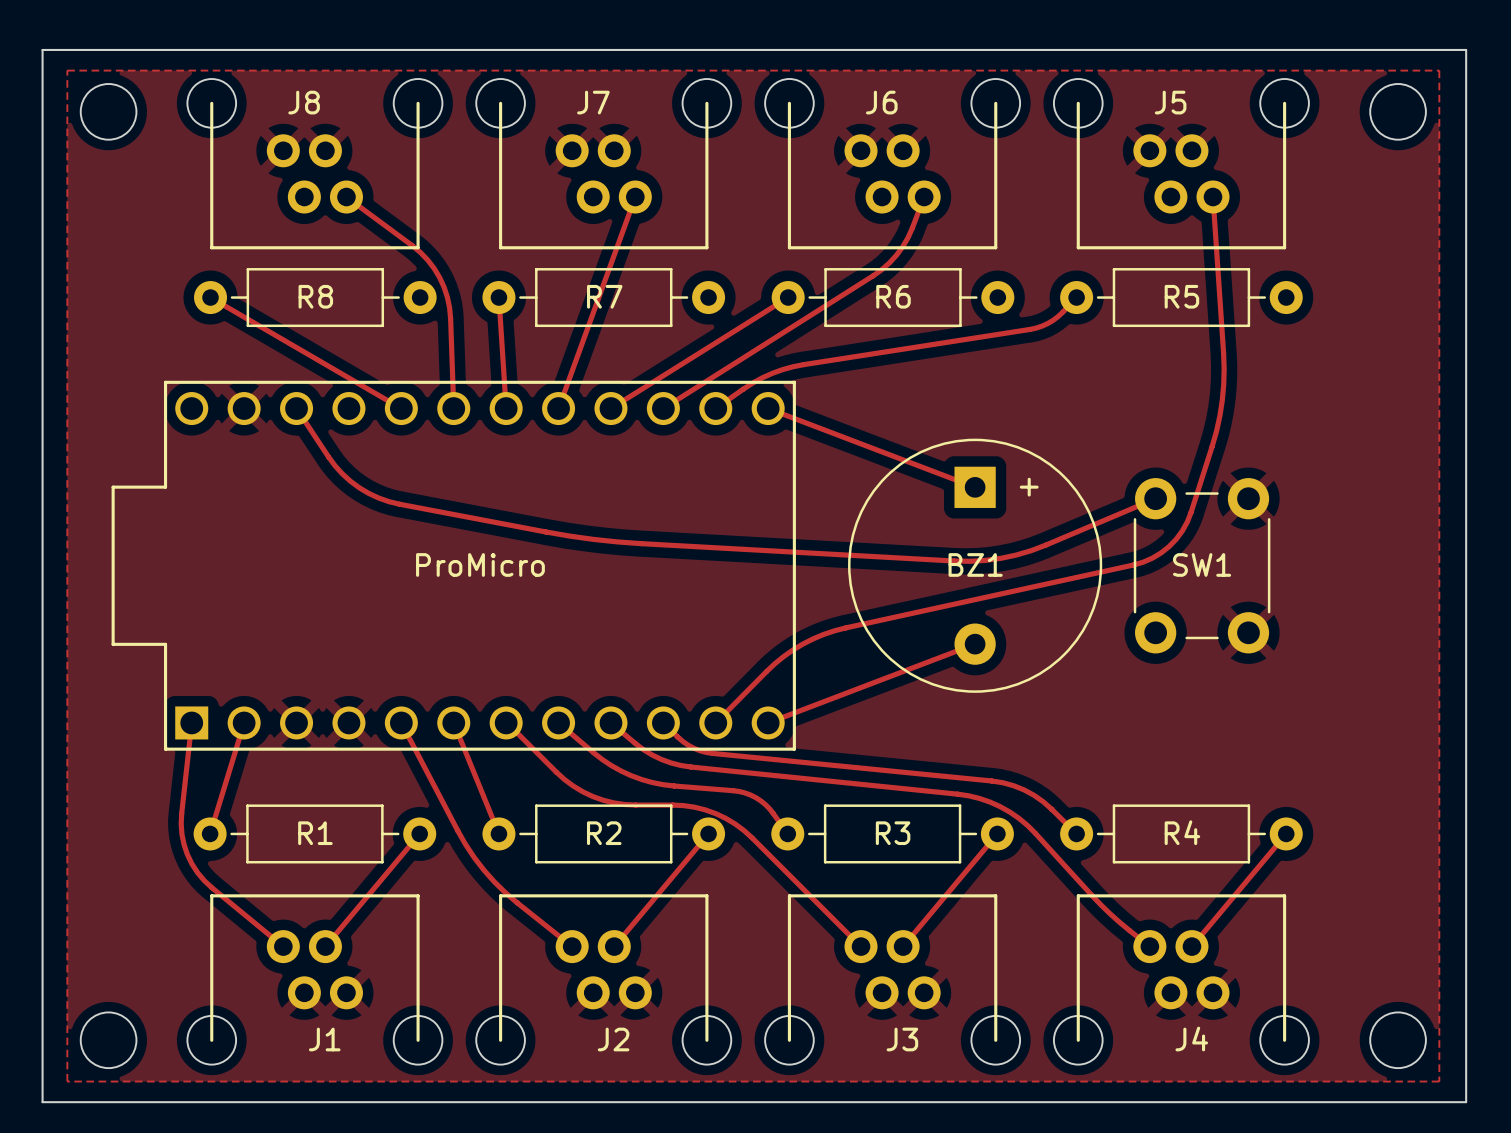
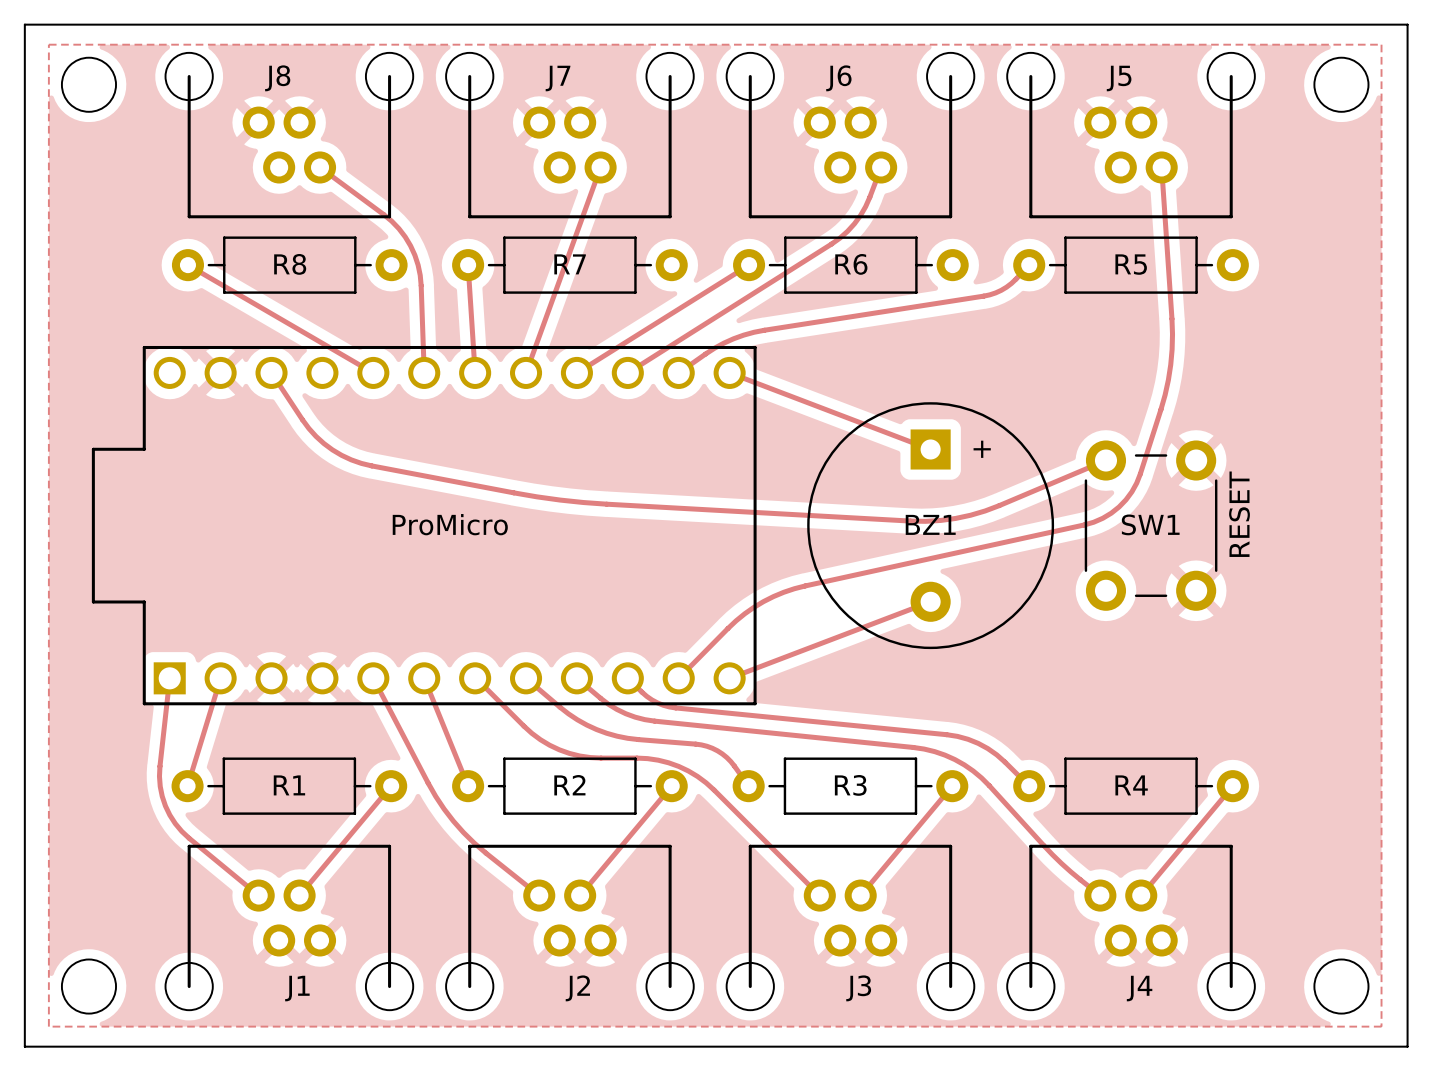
SW1 value: none -> RESET (1239, 514)

